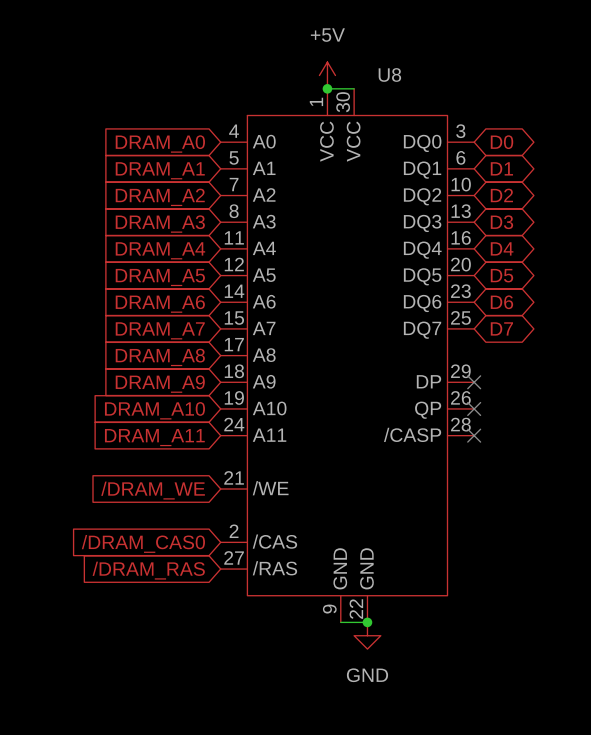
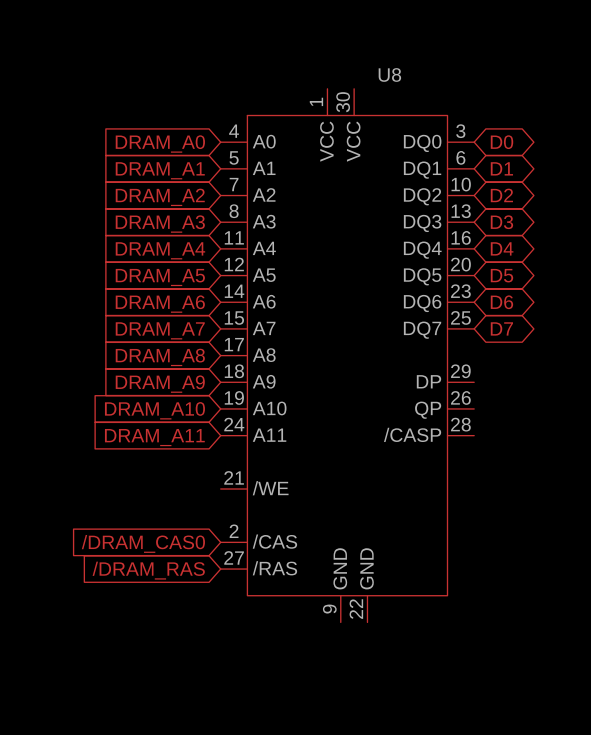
power symbol: +5V (327, 75) -> none
wire: (327, 88) (354, 88) -> none
junction: (327, 88) -> none
no-connect mark: (474, 382) -> none
no-connect mark: (474, 408) -> none
no-connect mark: (474, 435) -> none
global label: /DRAM_WE (153, 490) -> none
wire: (340, 622) (367, 622) -> none
junction: (367, 622) -> none
power symbol: GND (367, 635) -> none

